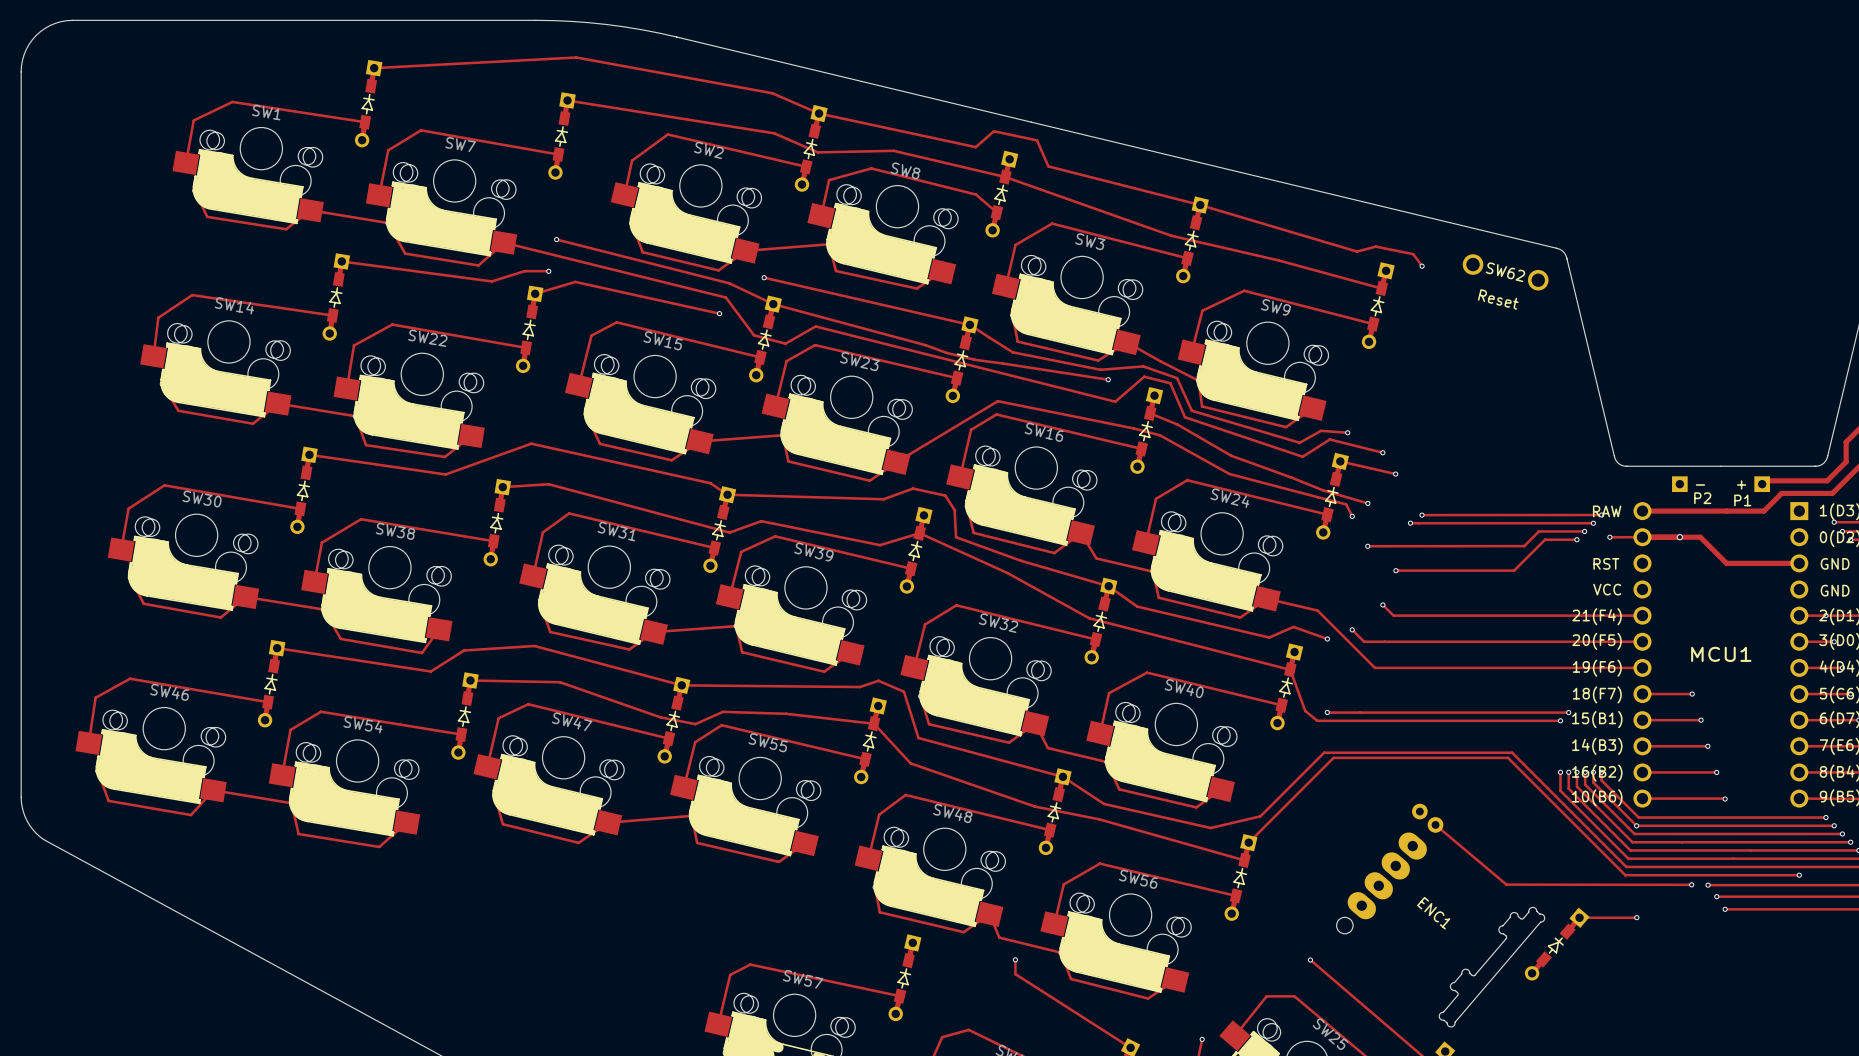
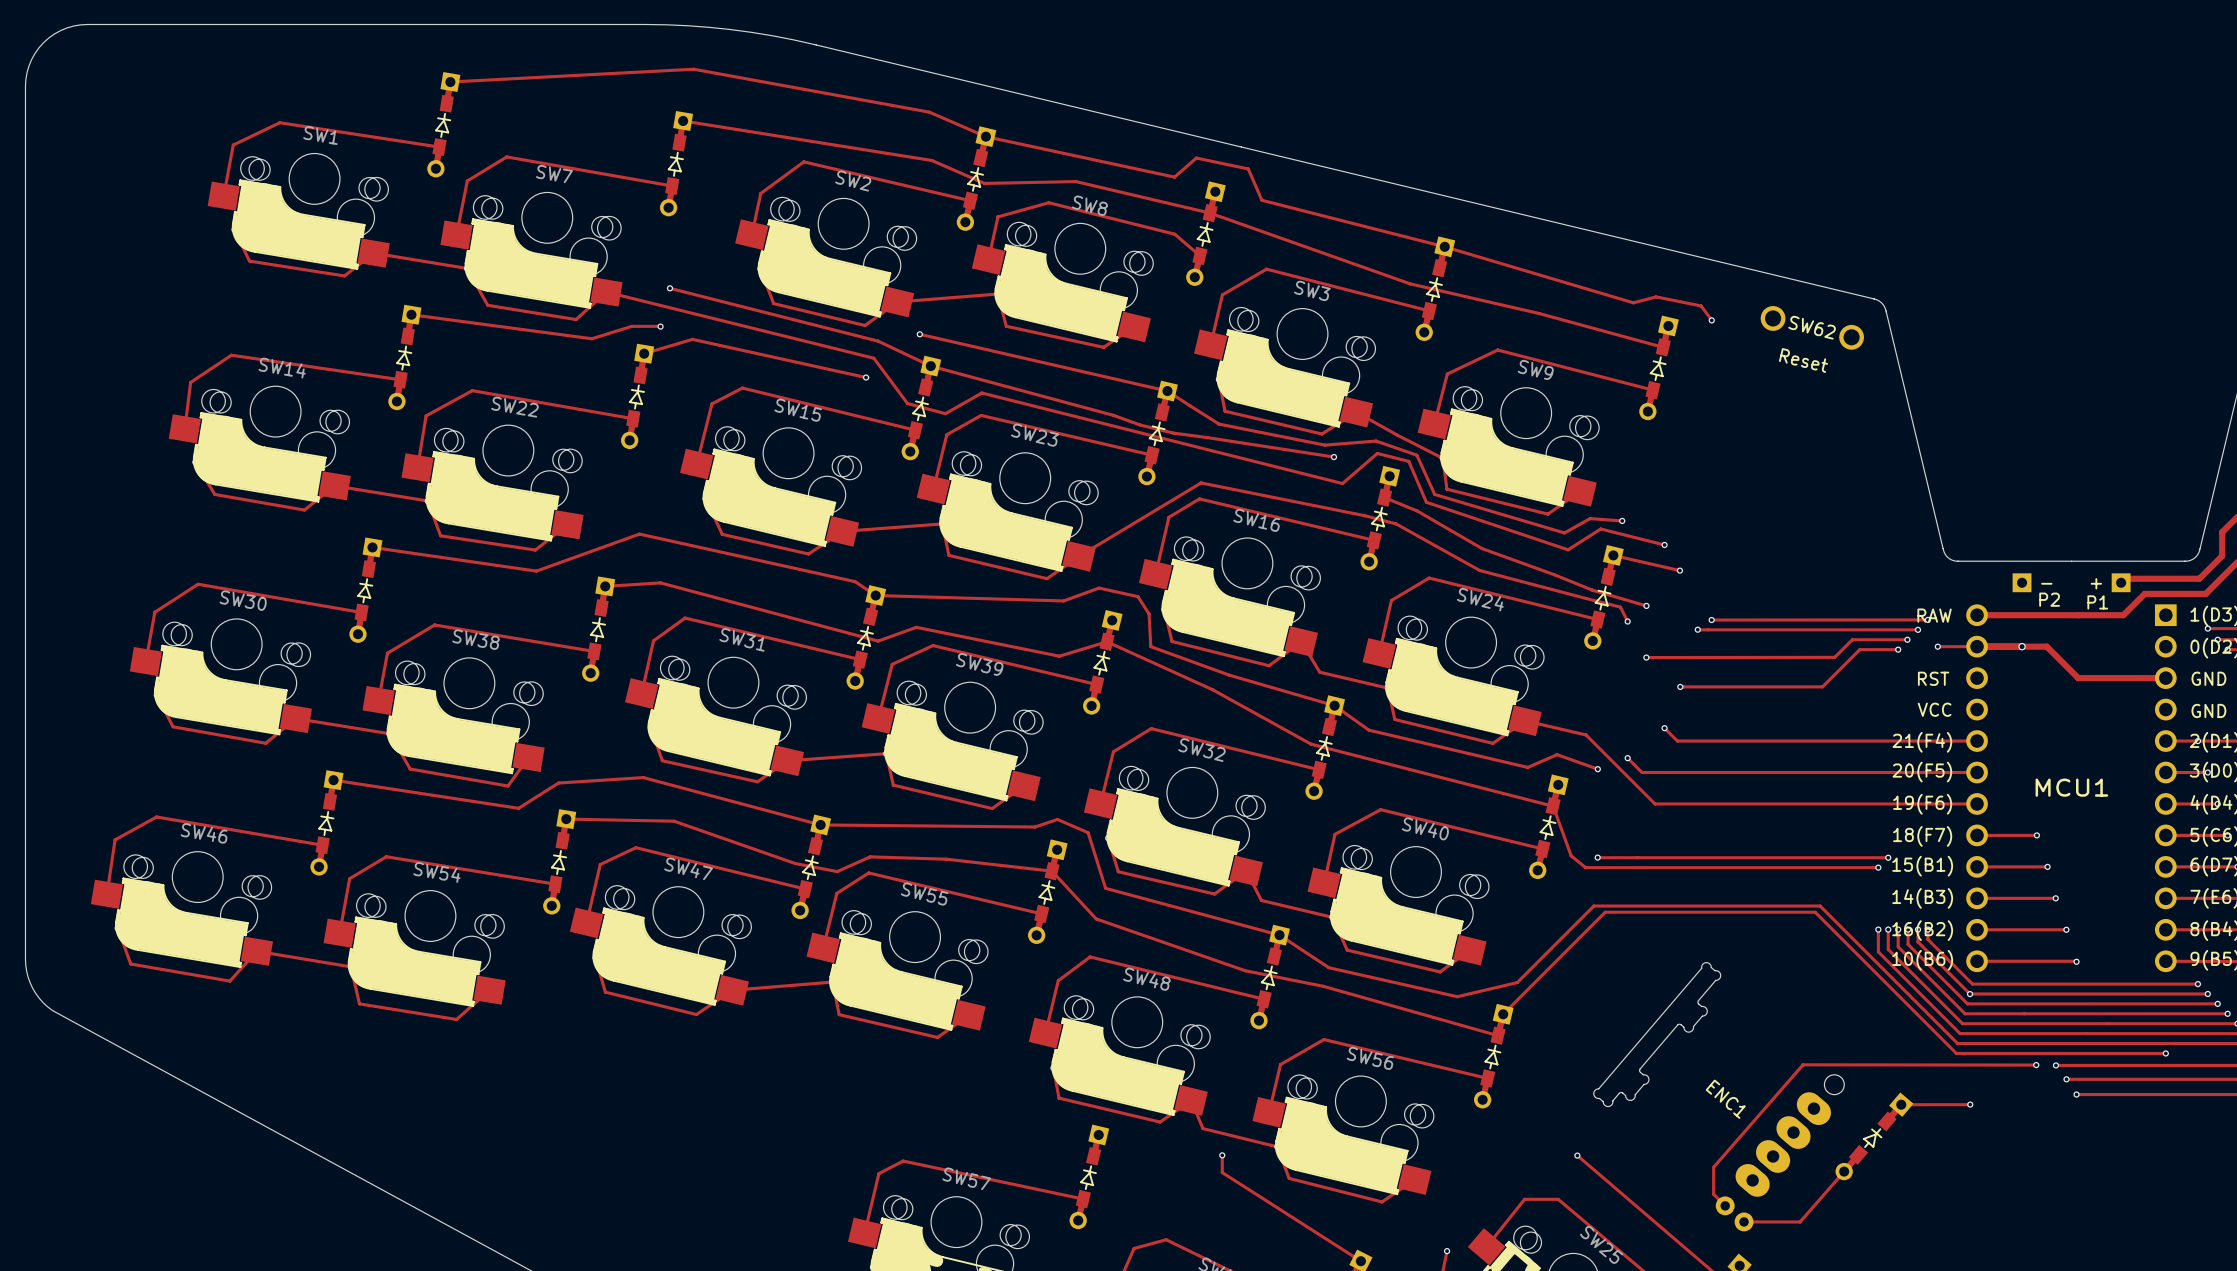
ENC1 footprint: [1336, 803, 1545, 1028] -> [1593, 962, 1845, 1232]
track: (1435, 824) (1506, 884) -> (1725, 1205) (1713, 1194) (1713, 1167) (1803, 1064) (1813, 1064)
track: none -> (1844, 1171) (1800, 1222) (1744, 1221)

